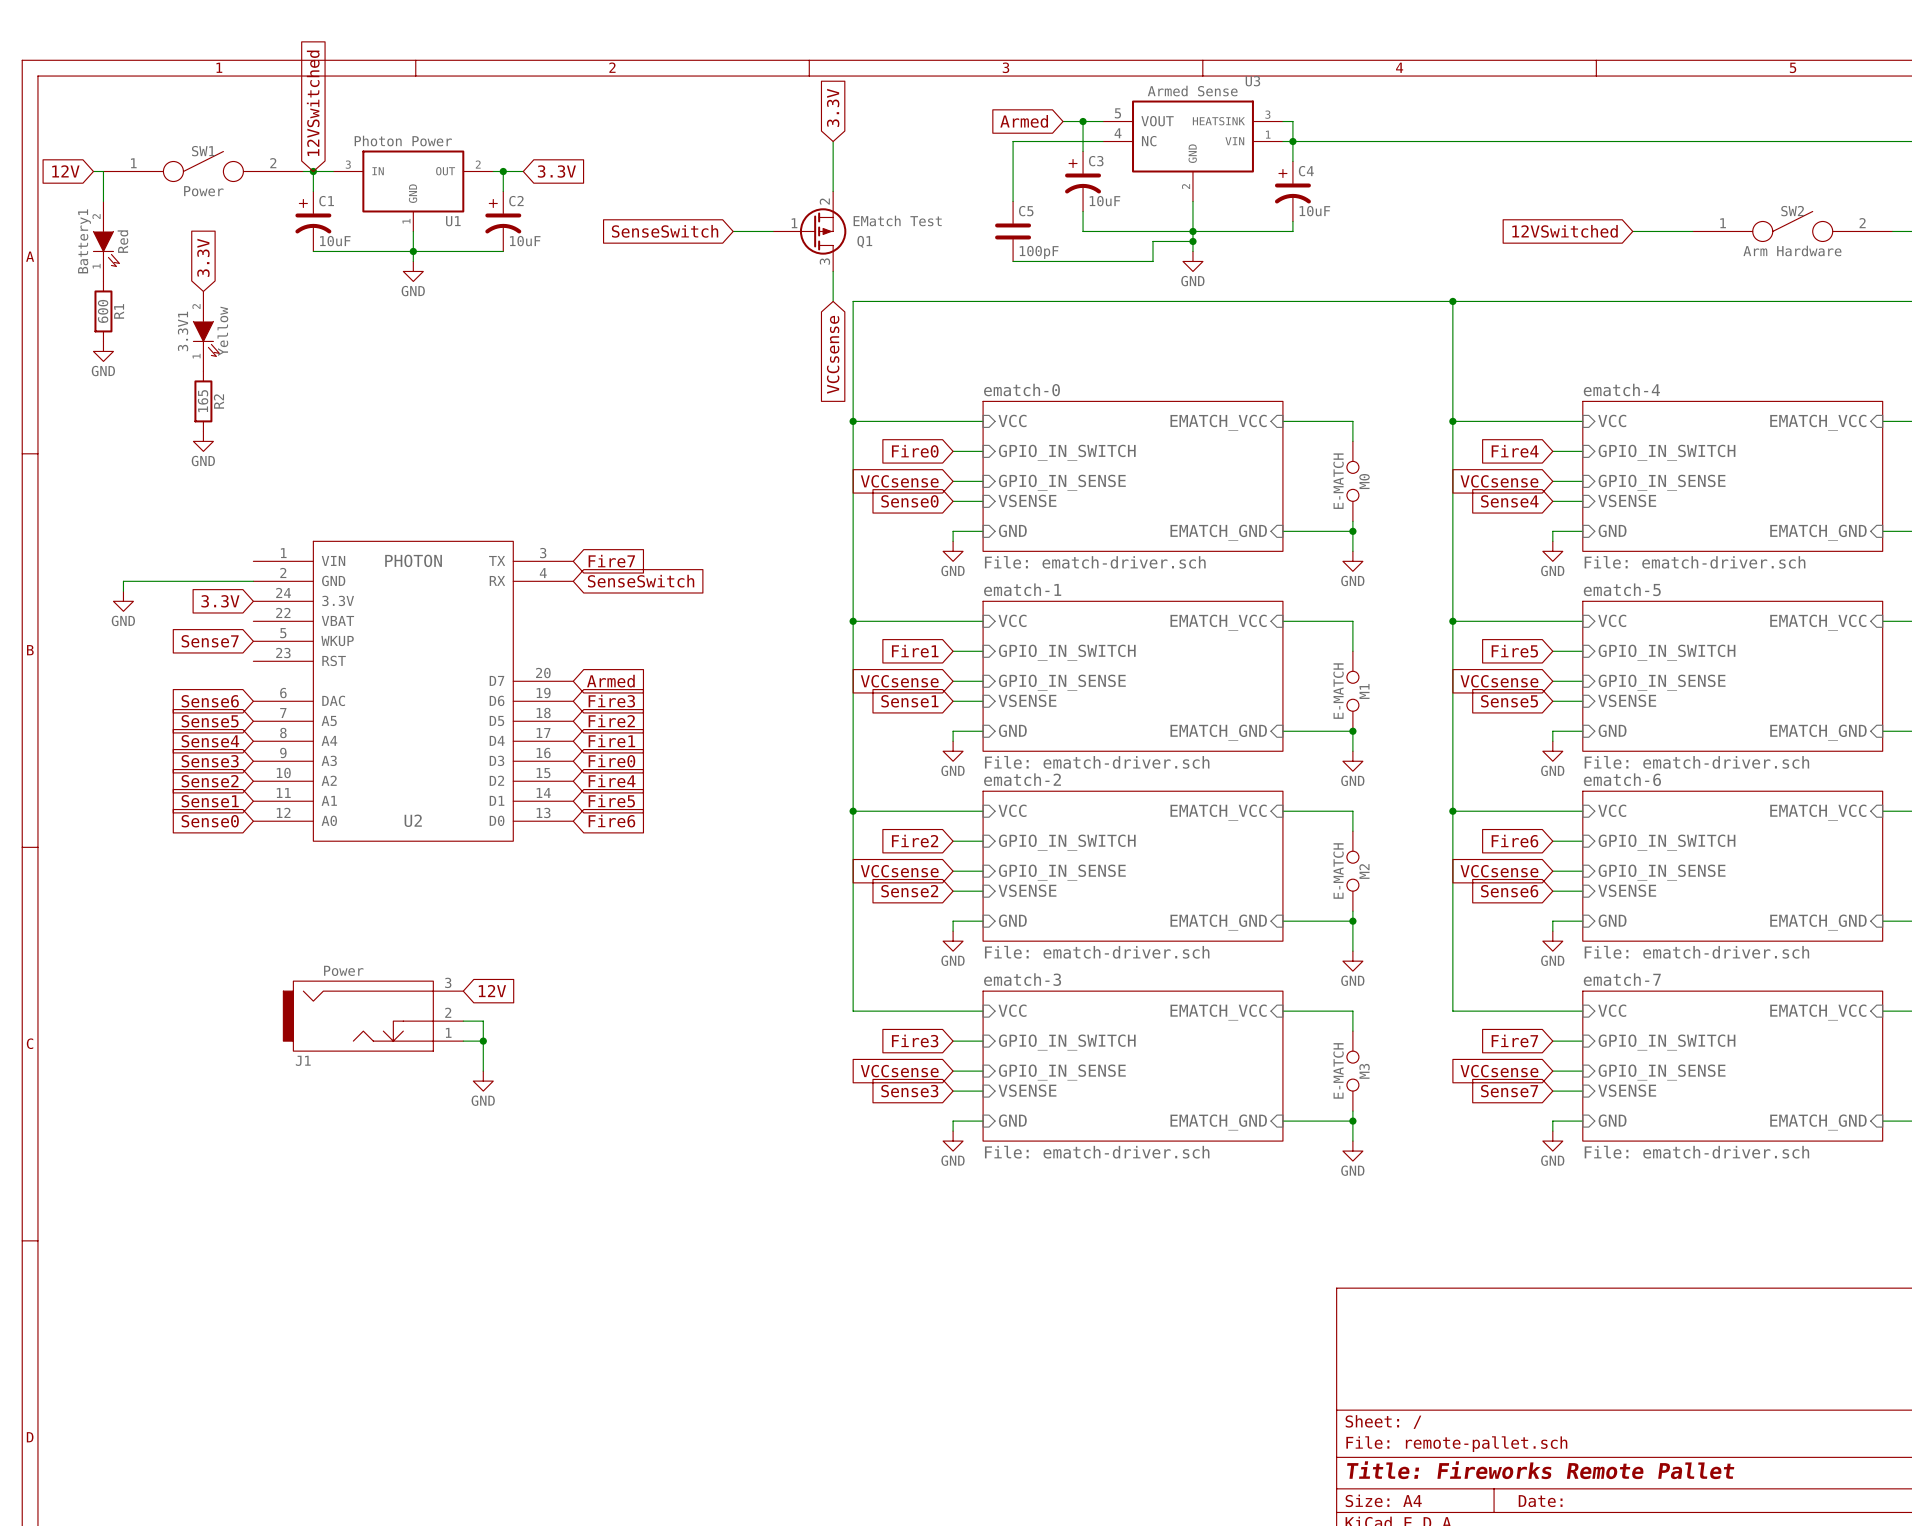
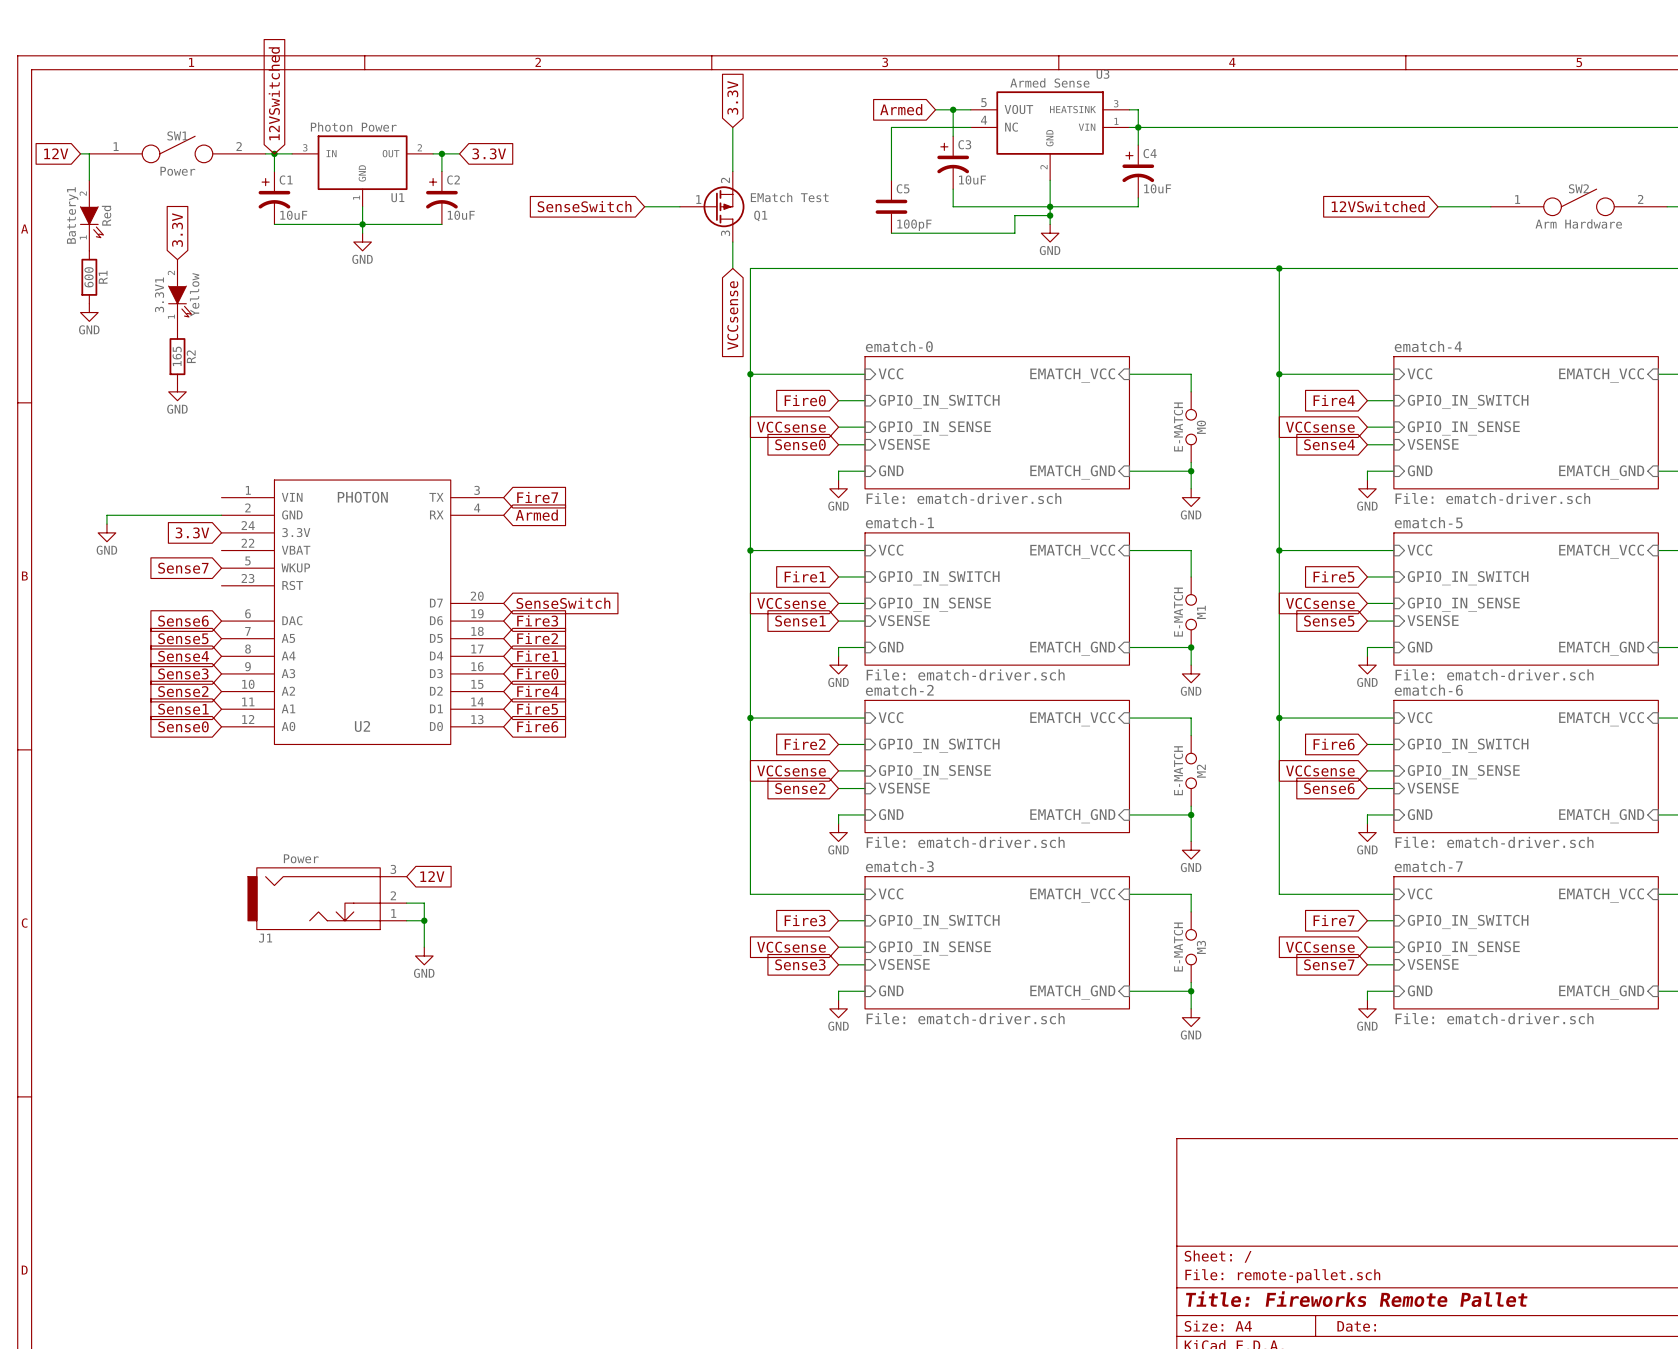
global label: SenseSwitch (641, 581) -> Armed (536, 515)
global label: Armed (610, 681) -> SenseSwitch (563, 603)

